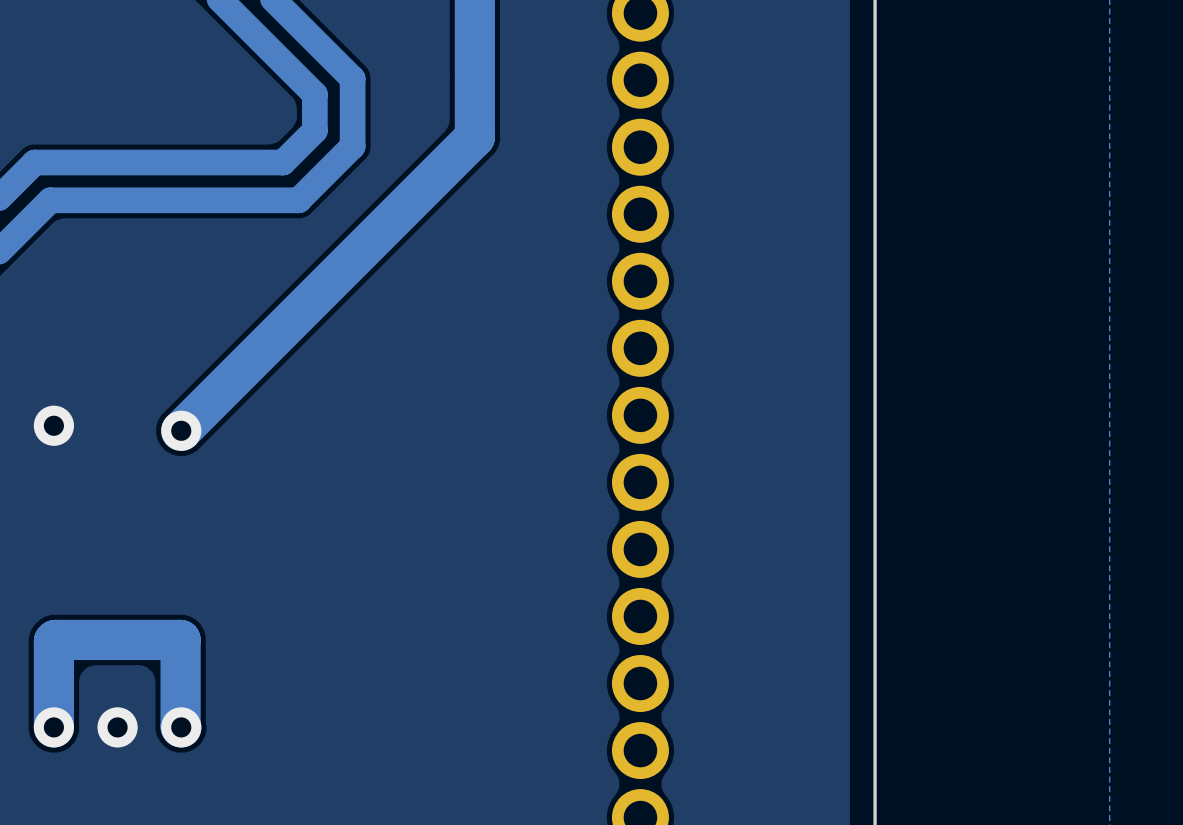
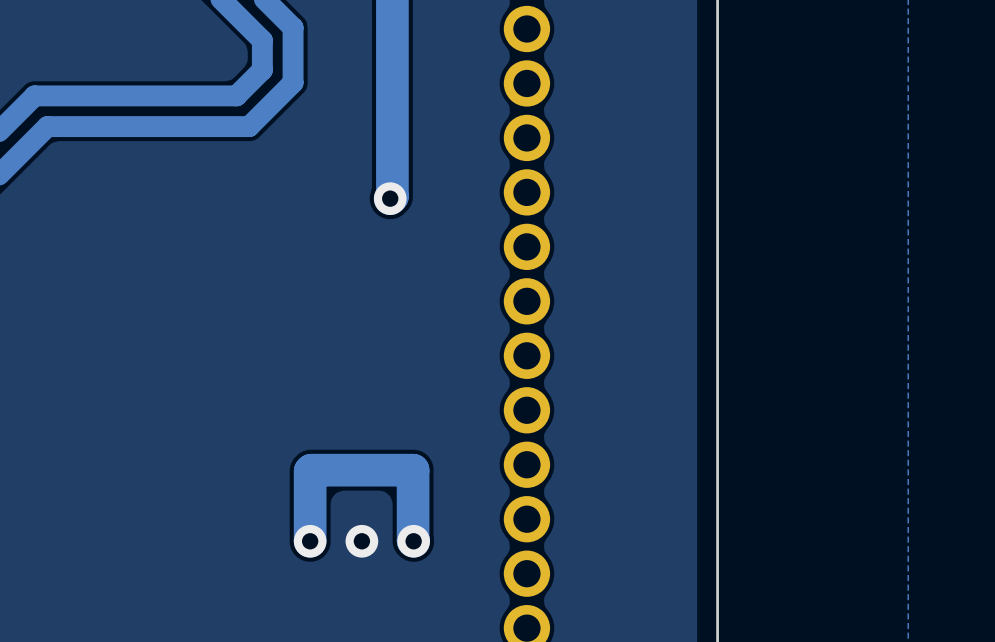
track: (474, 137) (181, 430) -> (392, 75) (392, 196) (390, 198)
via: none -> (390, 198)
via: (53, 425) -> none
via: (181, 430) -> none
via: none -> (310, 541)
via: none -> (361, 541)
via: none -> (413, 541)
track: (180, 726) (180, 639) (55, 639) (53, 727) -> (413, 540) (413, 470) (311, 470) (310, 541)
via: (53, 727) -> none
via: (117, 727) -> none
via: (181, 727) -> none

